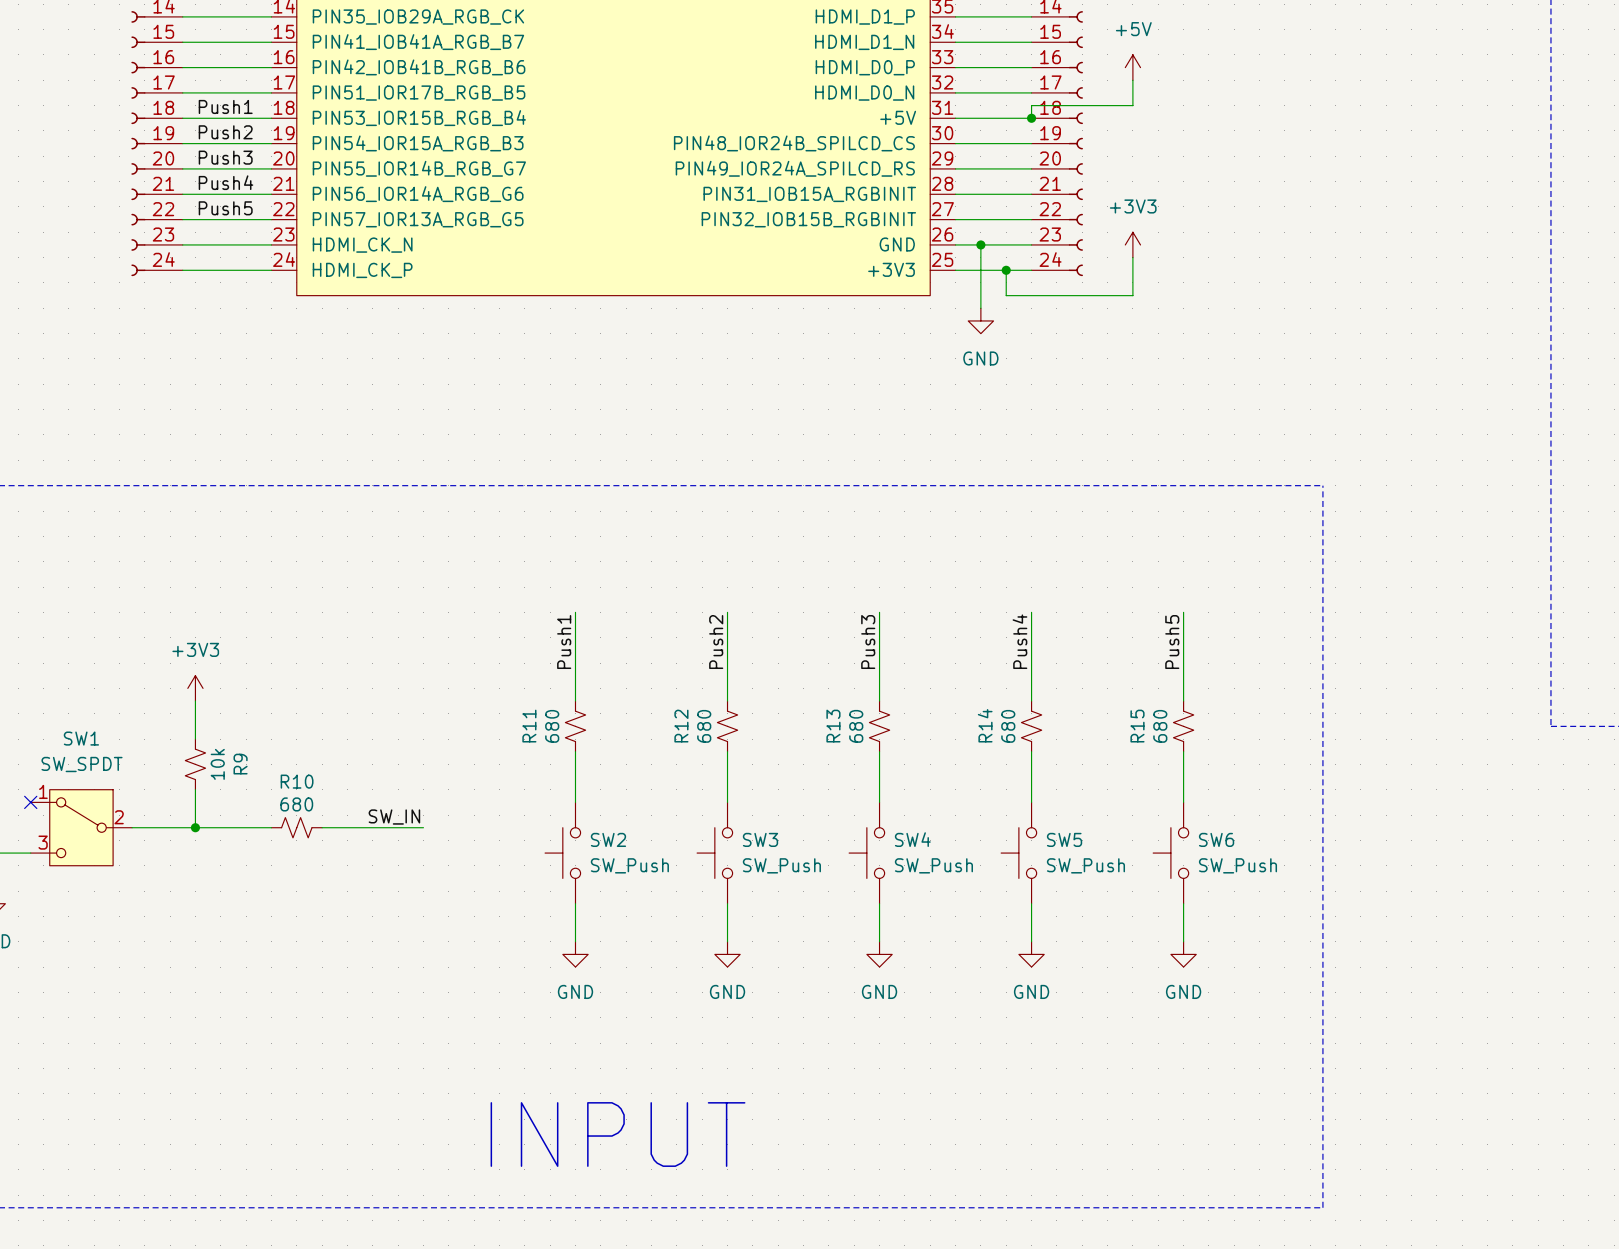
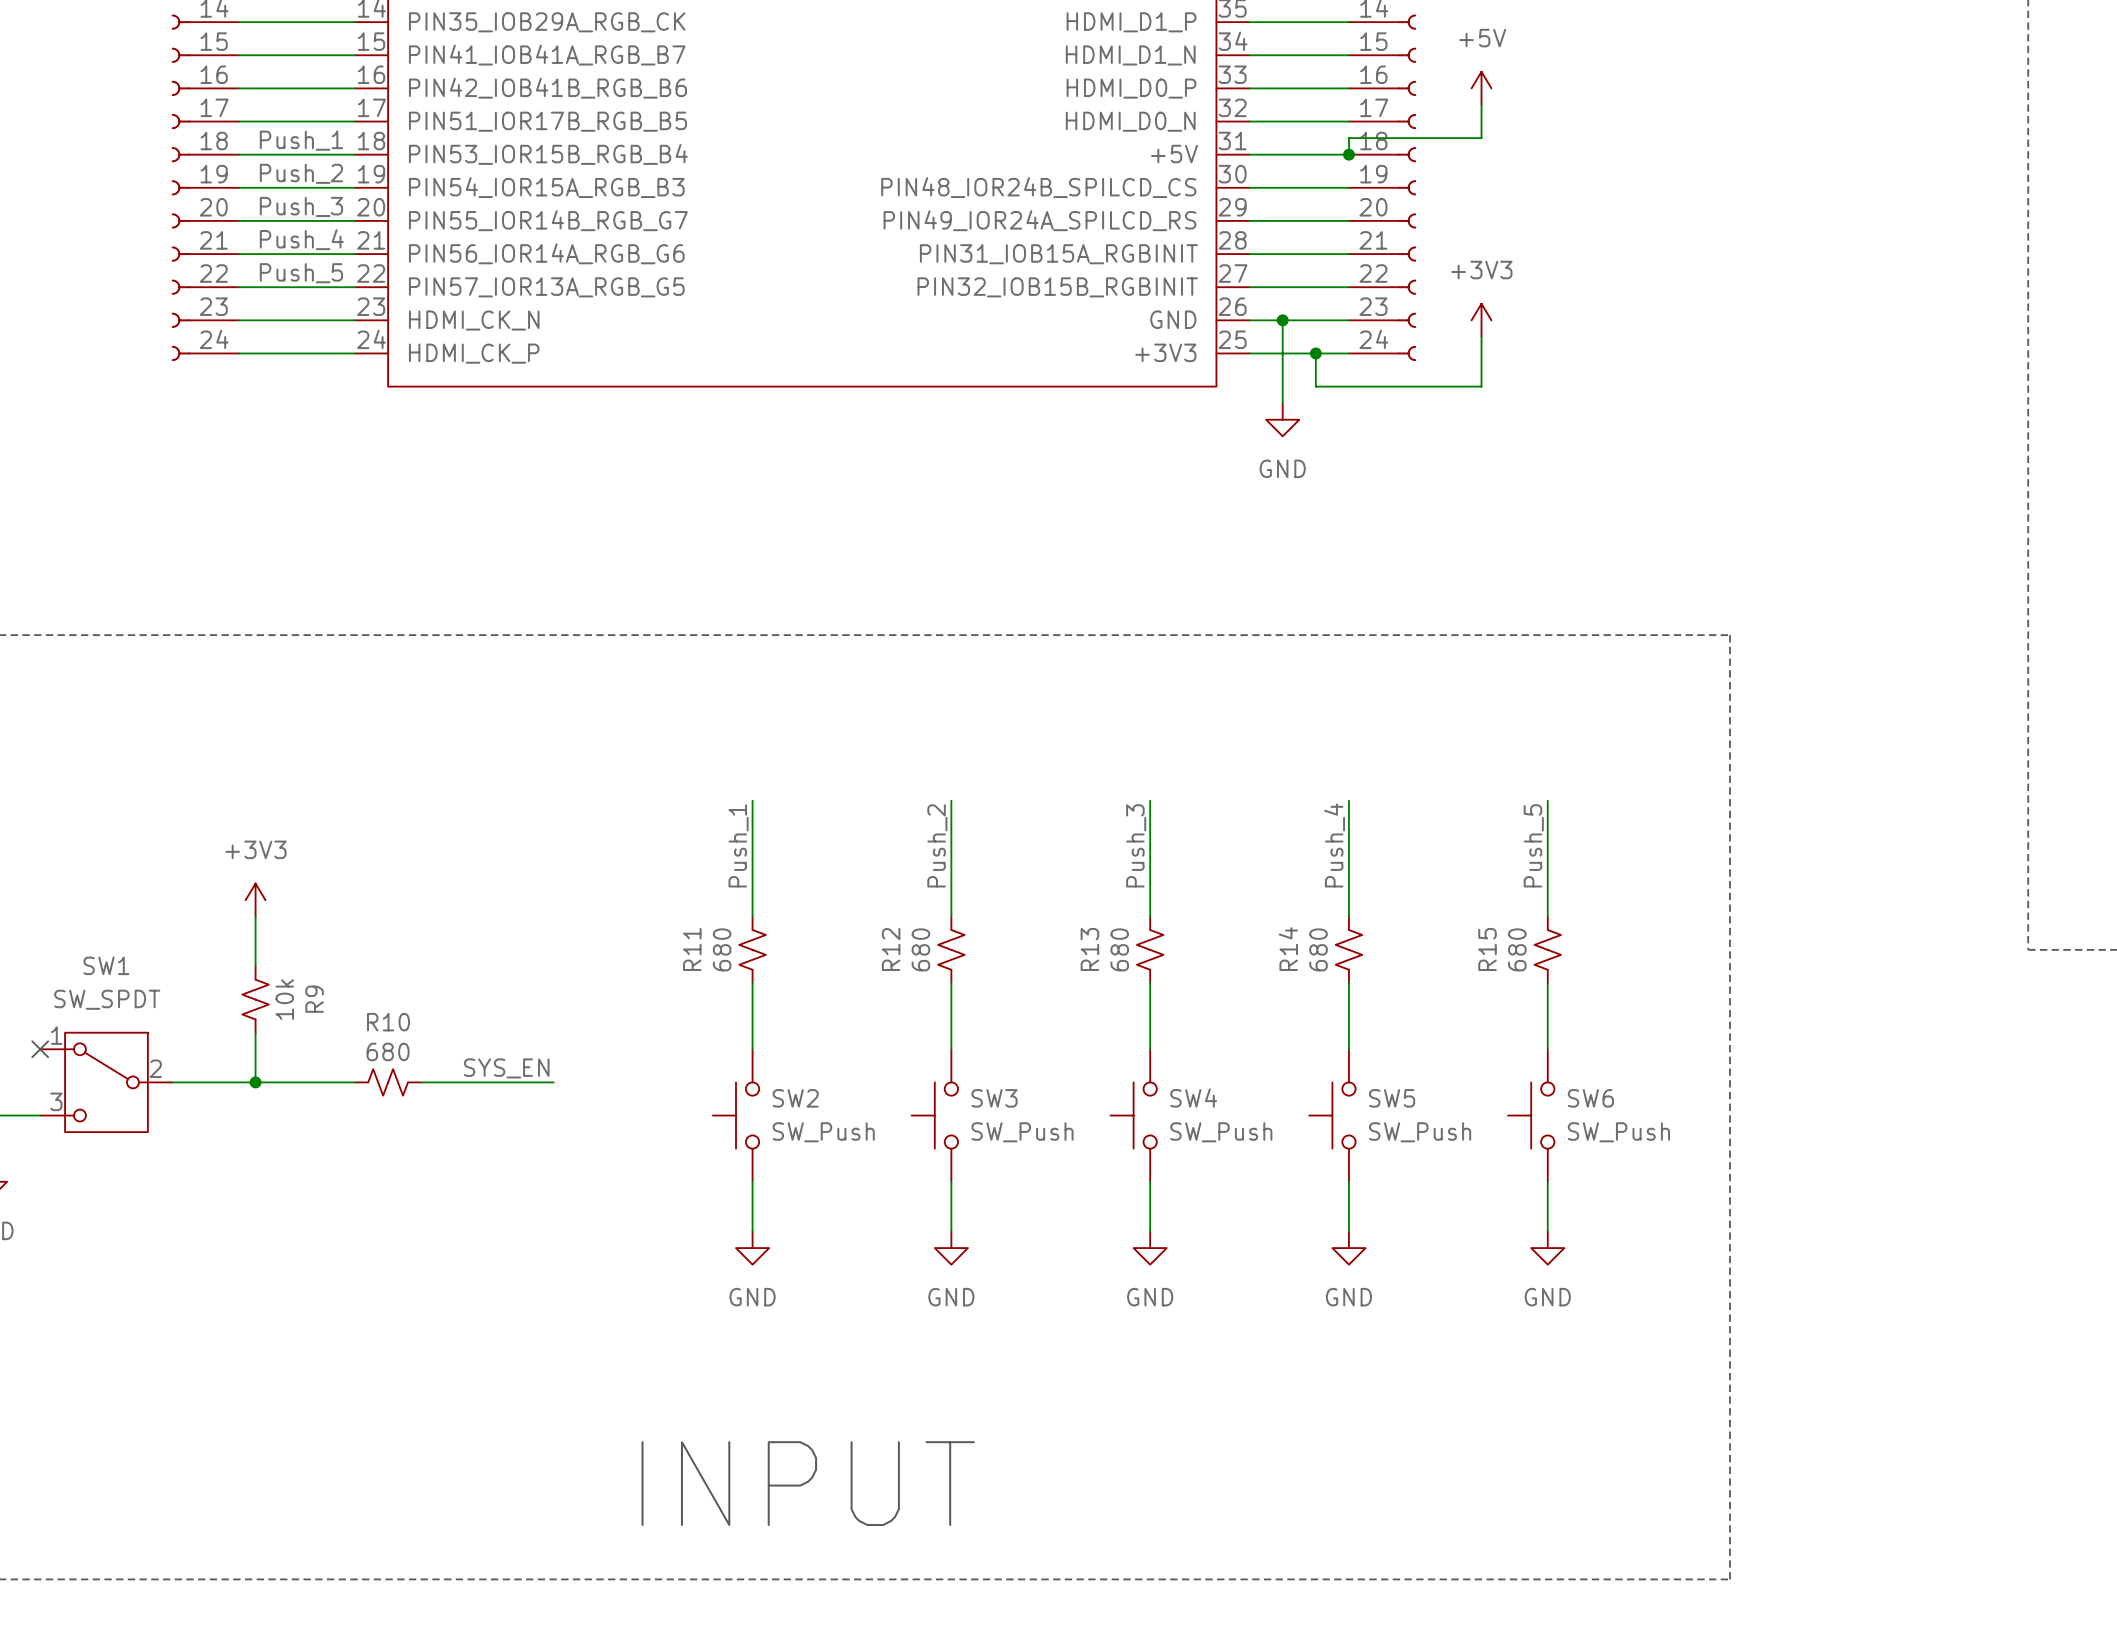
label: Push1 (225, 106) -> Push_1 (301, 140)
label: Push2 (225, 132) -> Push_2 (301, 173)
label: Push3 (225, 157) -> Push_3 (301, 206)
label: Push4 (225, 182) -> Push_4 (301, 239)
label: Push5 (225, 208) -> Push_5 (301, 273)
label: Push4 (1019, 641) -> Push_4 (1334, 845)
label: Push1 (564, 642) -> Push_1 (738, 845)
label: Push2 (716, 642) -> Push_2 (937, 845)
label: Push3 (868, 642) -> Push_3 (1136, 845)
label: Push5 (1172, 642) -> Push_5 (1533, 845)
label: SW_IN (394, 817) -> SYS_EN (506, 1068)

